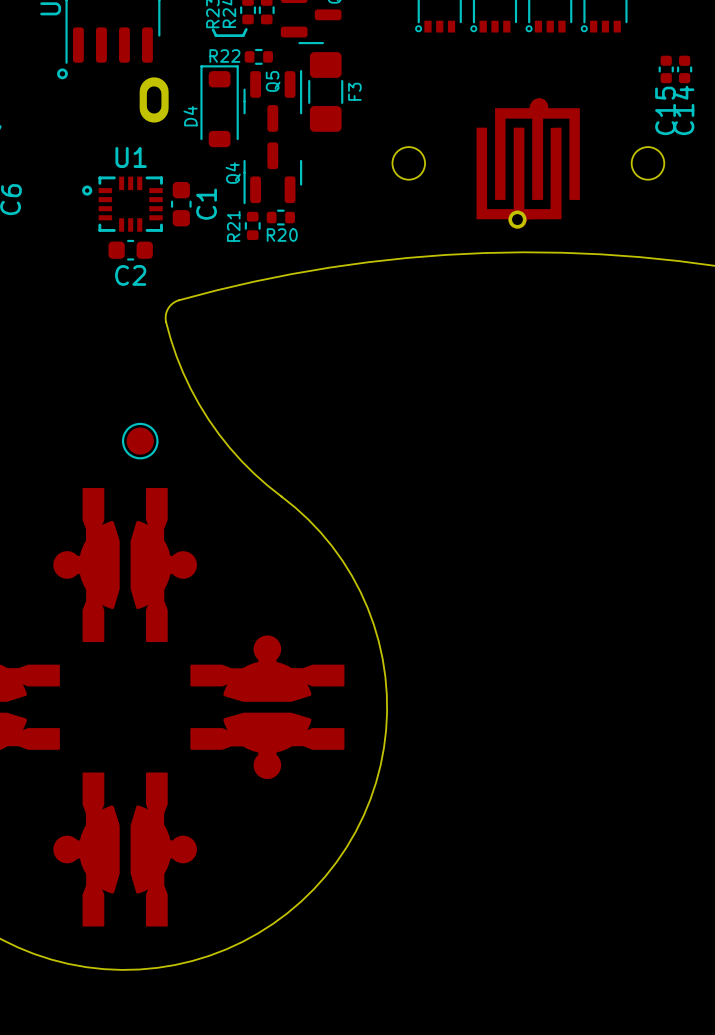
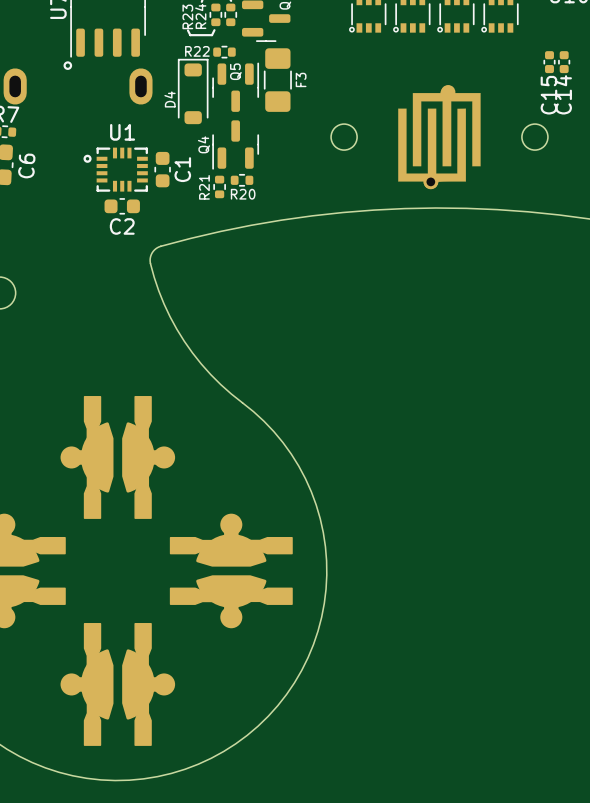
part: (140, 441) -> none

